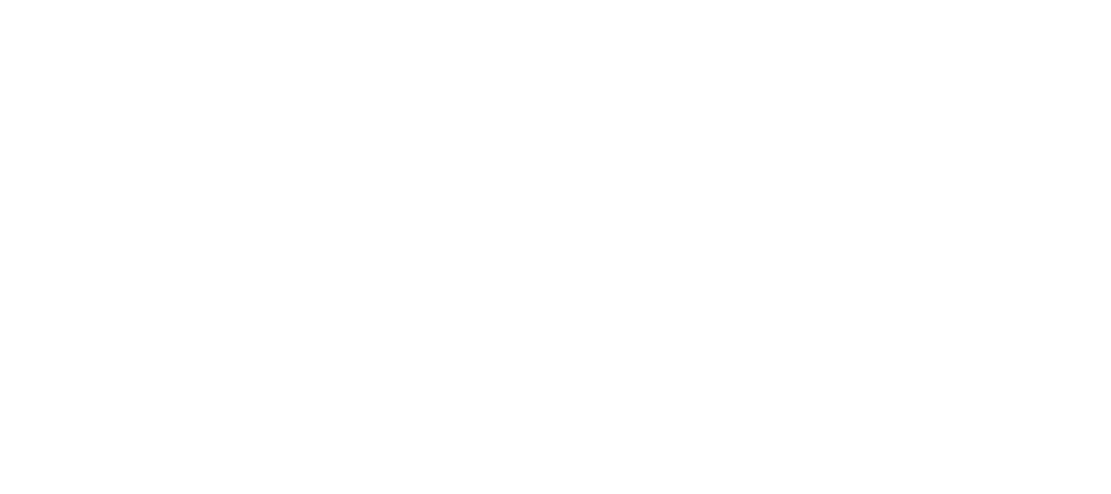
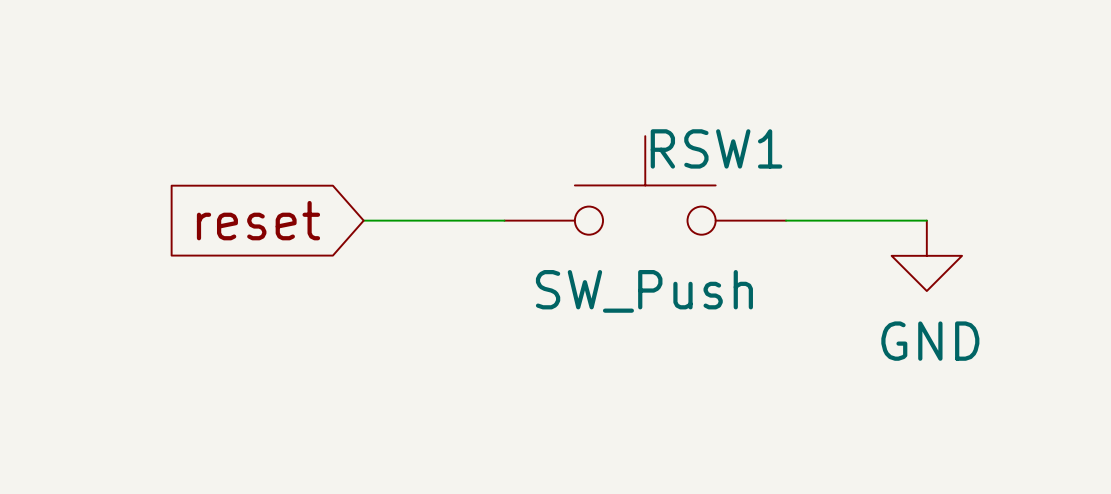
RSW1: none -> SW_Push (645, 185)
global label: none -> reset (258, 220)
wire: none -> (363, 220) (504, 220)
wire: none -> (786, 220) (926, 220)
power symbol: none -> GND (926, 255)

